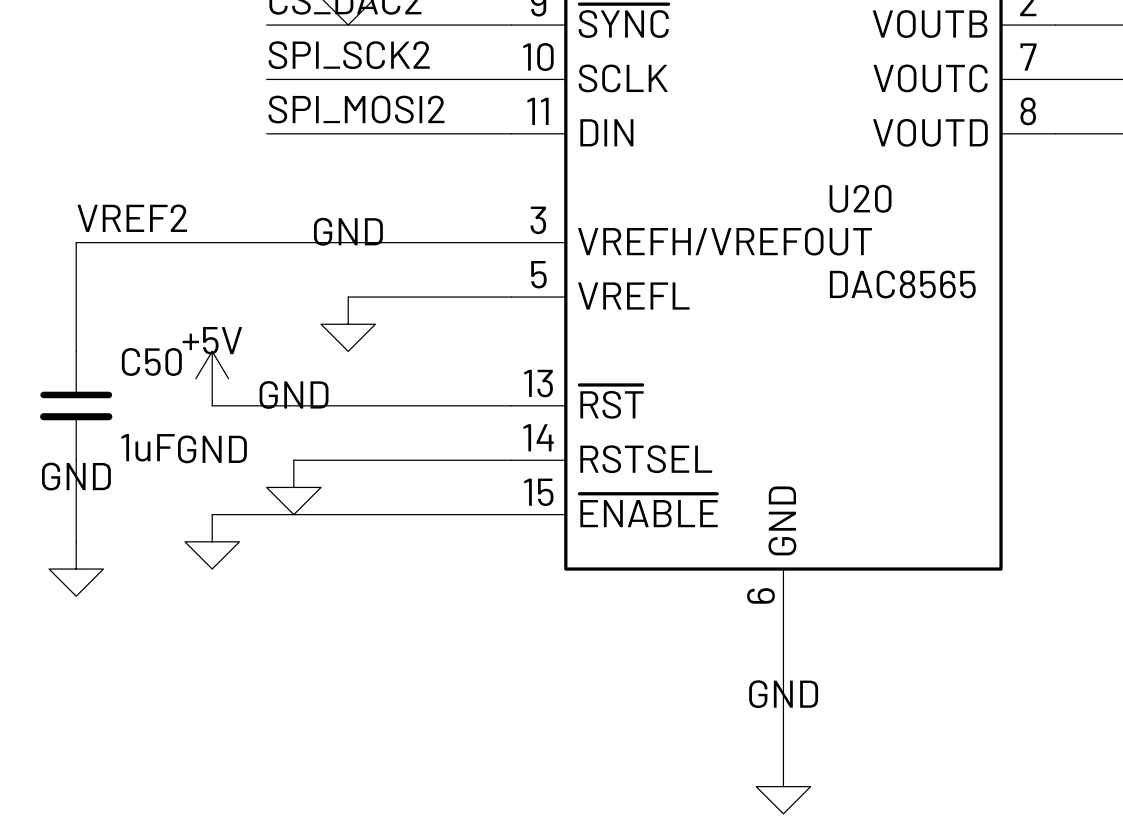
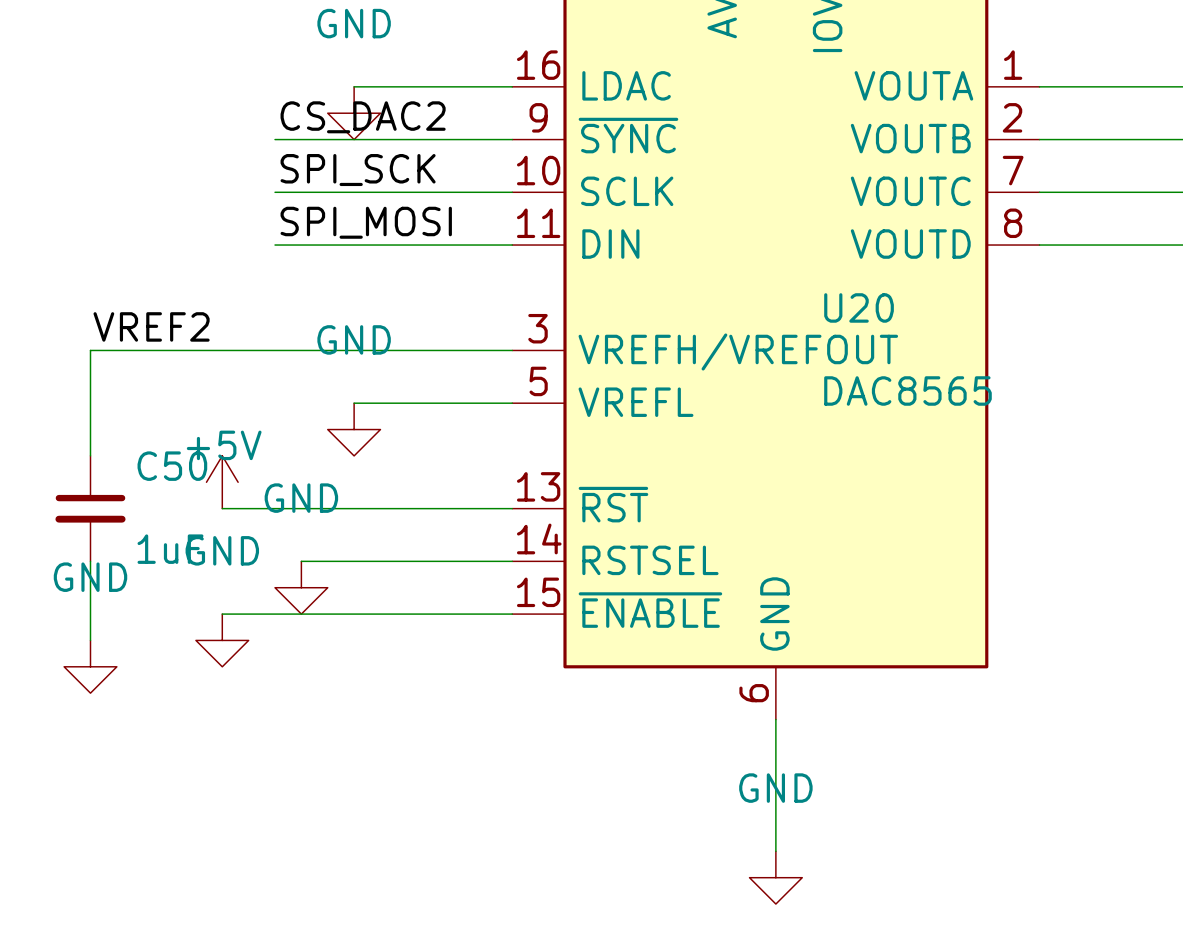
label: SPI_SCK2 (349, 55) -> SPI_SCK (358, 170)
label: SPI_MOSI2 (356, 109) -> SPI_MOSI (366, 222)

